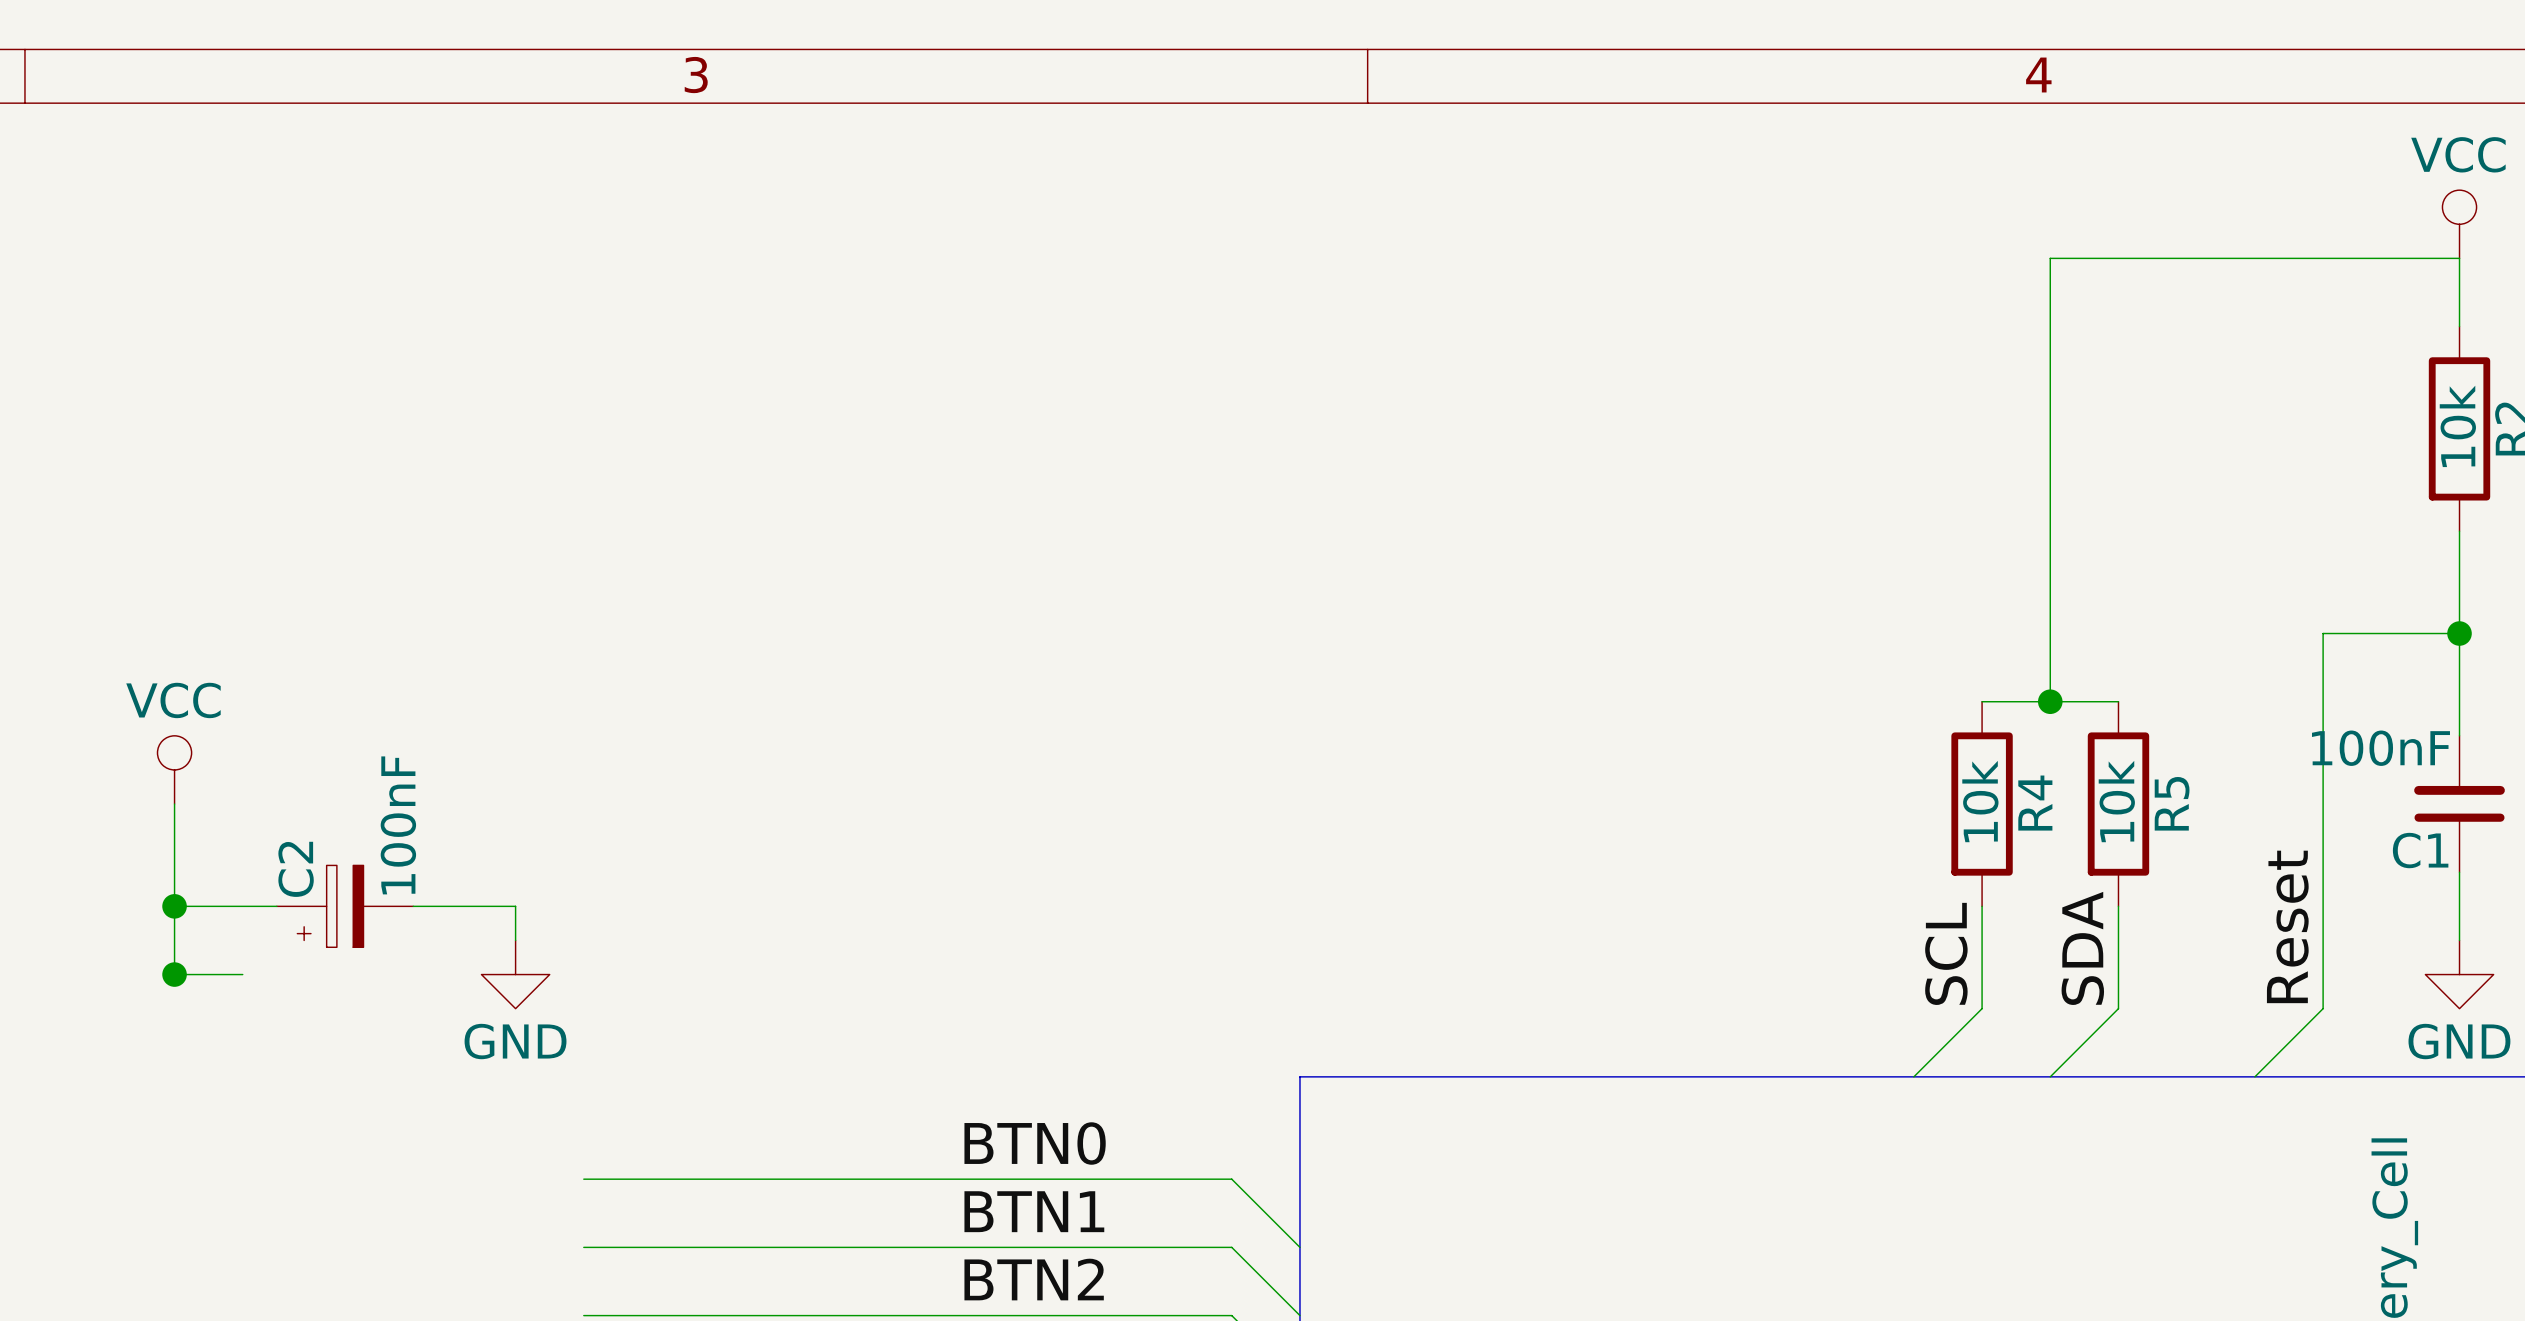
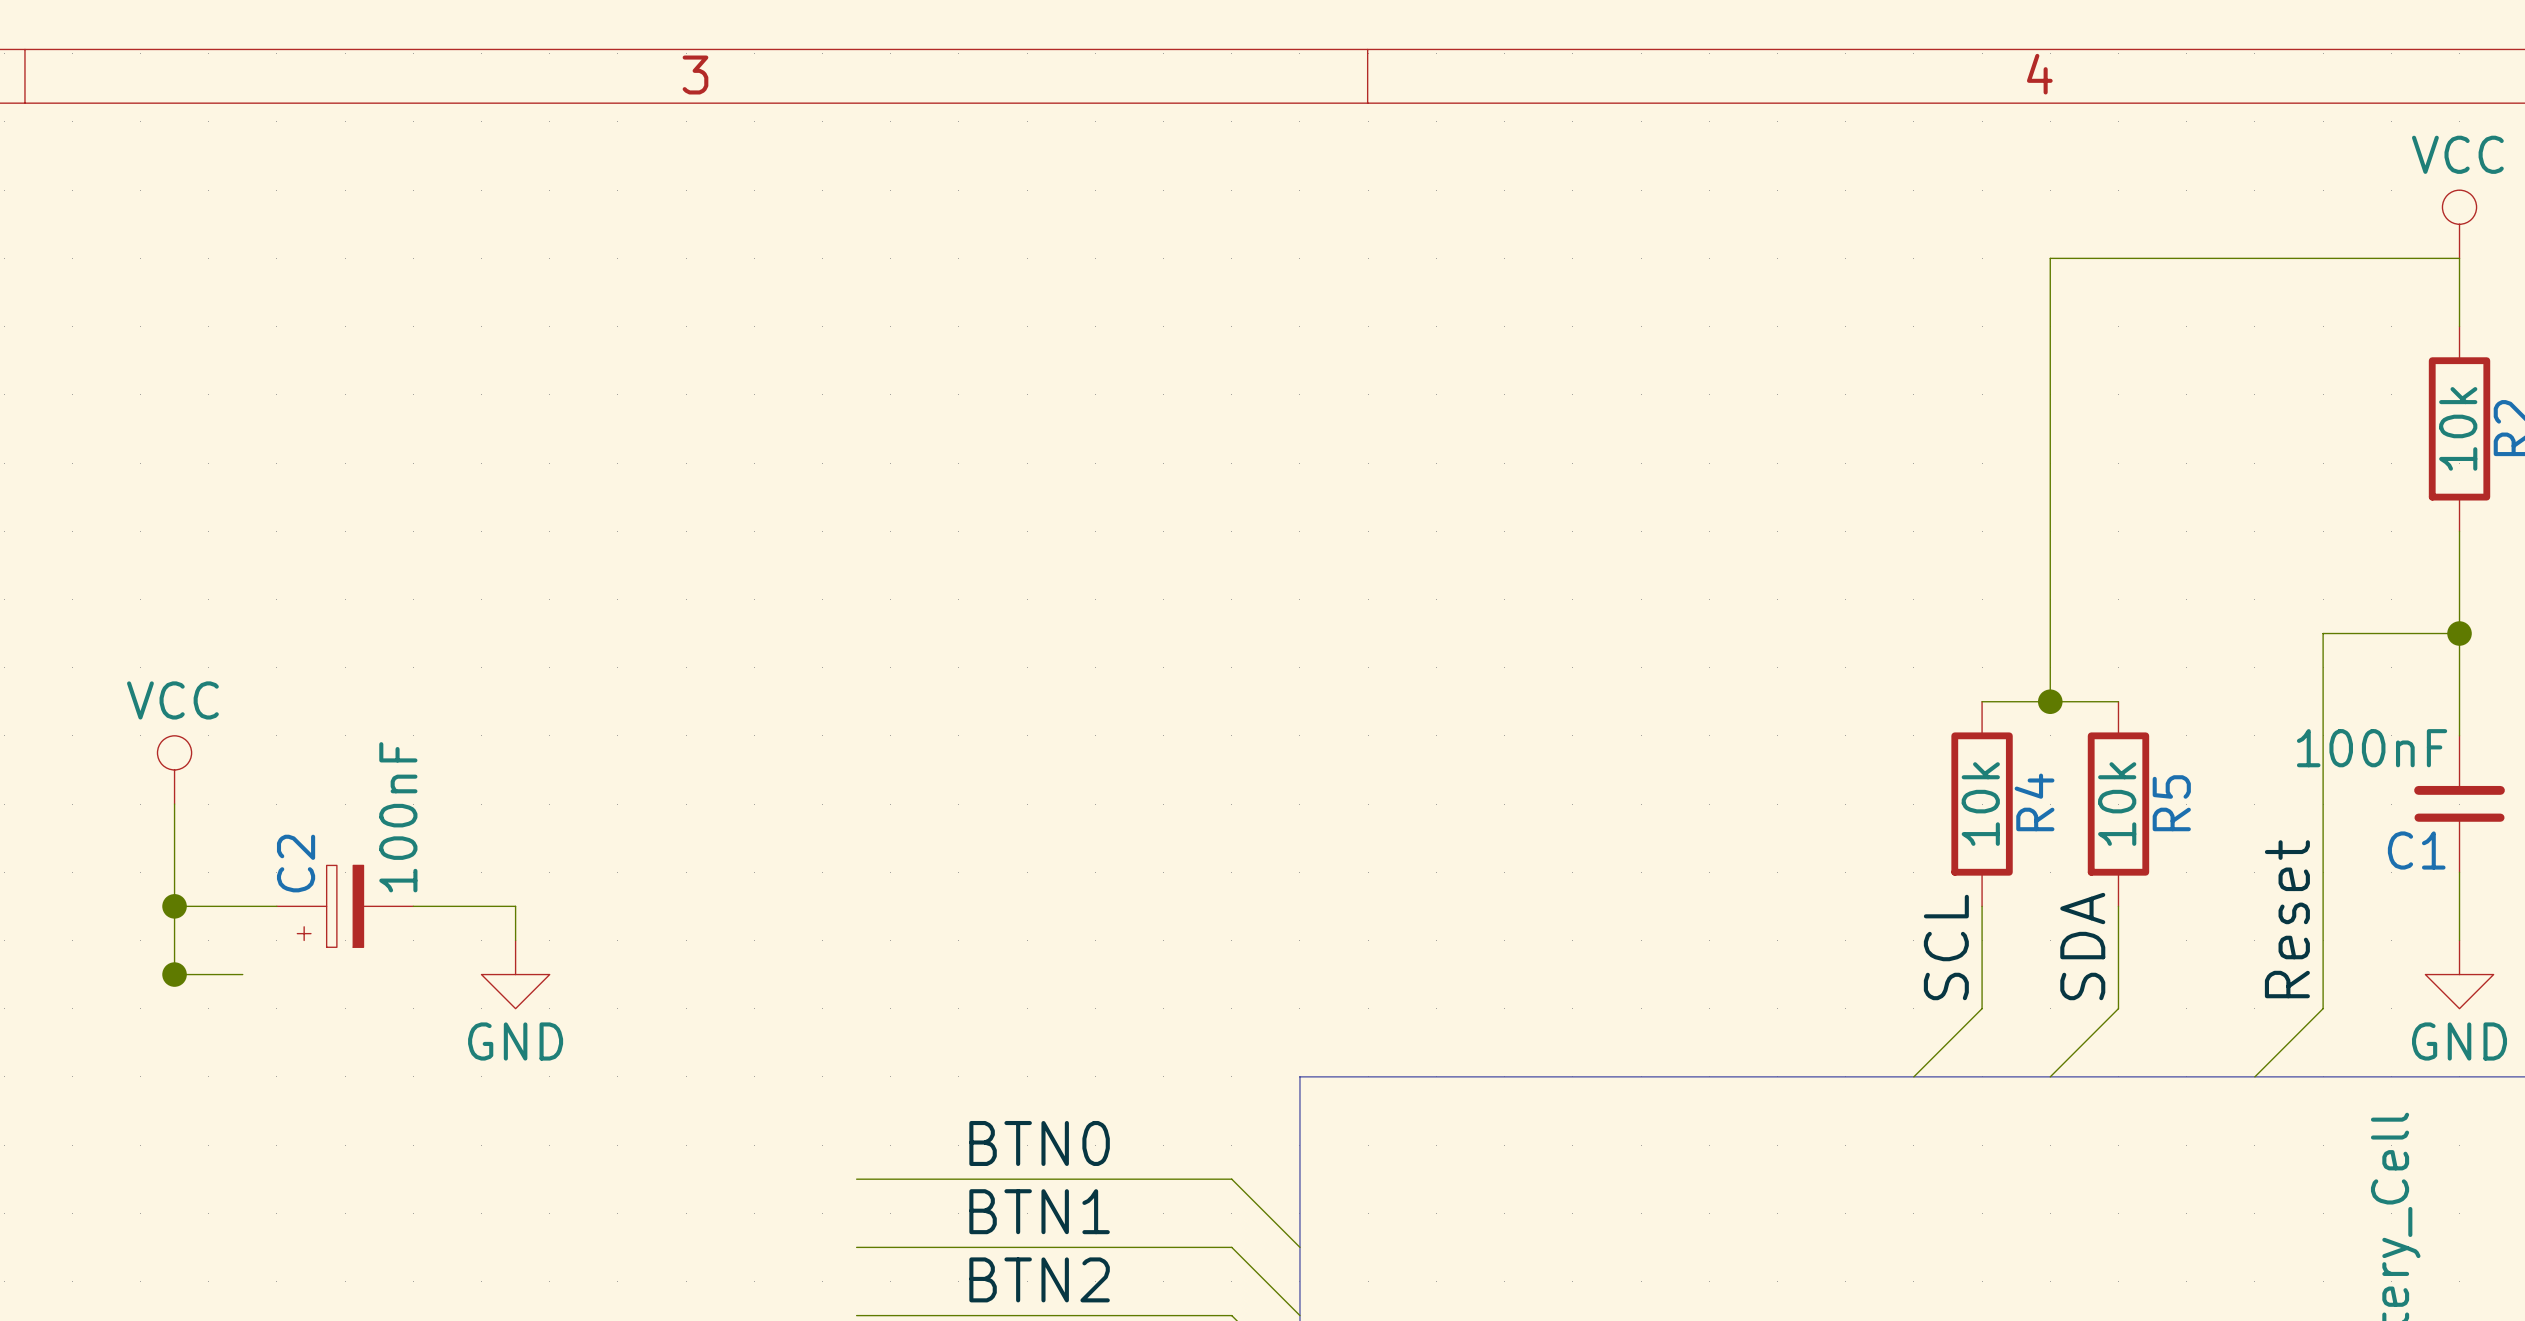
wire: (583, 1179) (856, 1179) -> none
wire: (583, 1247) (856, 1247) -> none
wire: (583, 1315) (856, 1315) -> none

